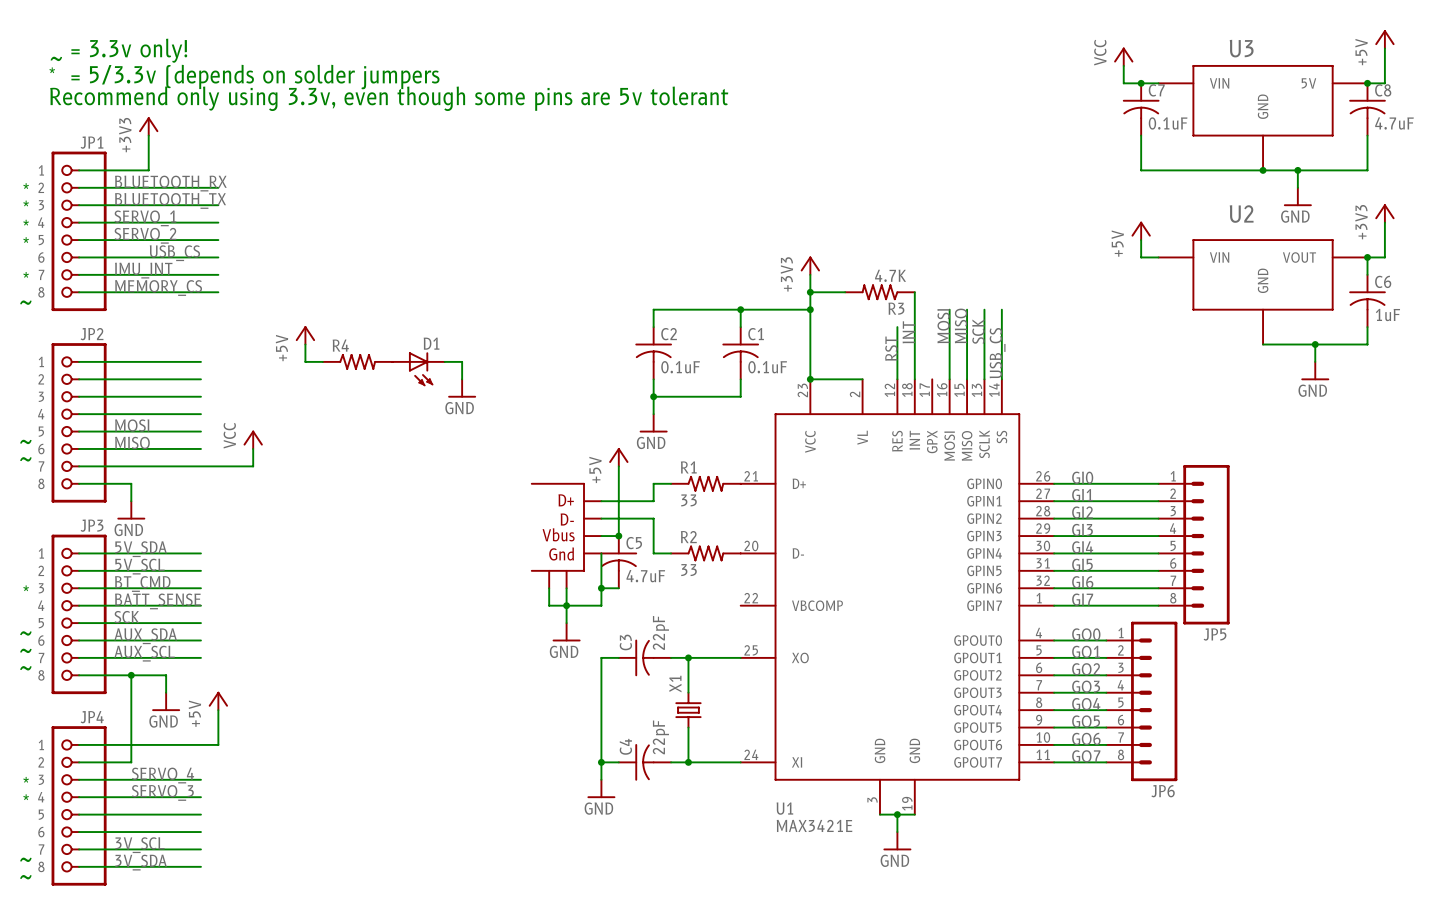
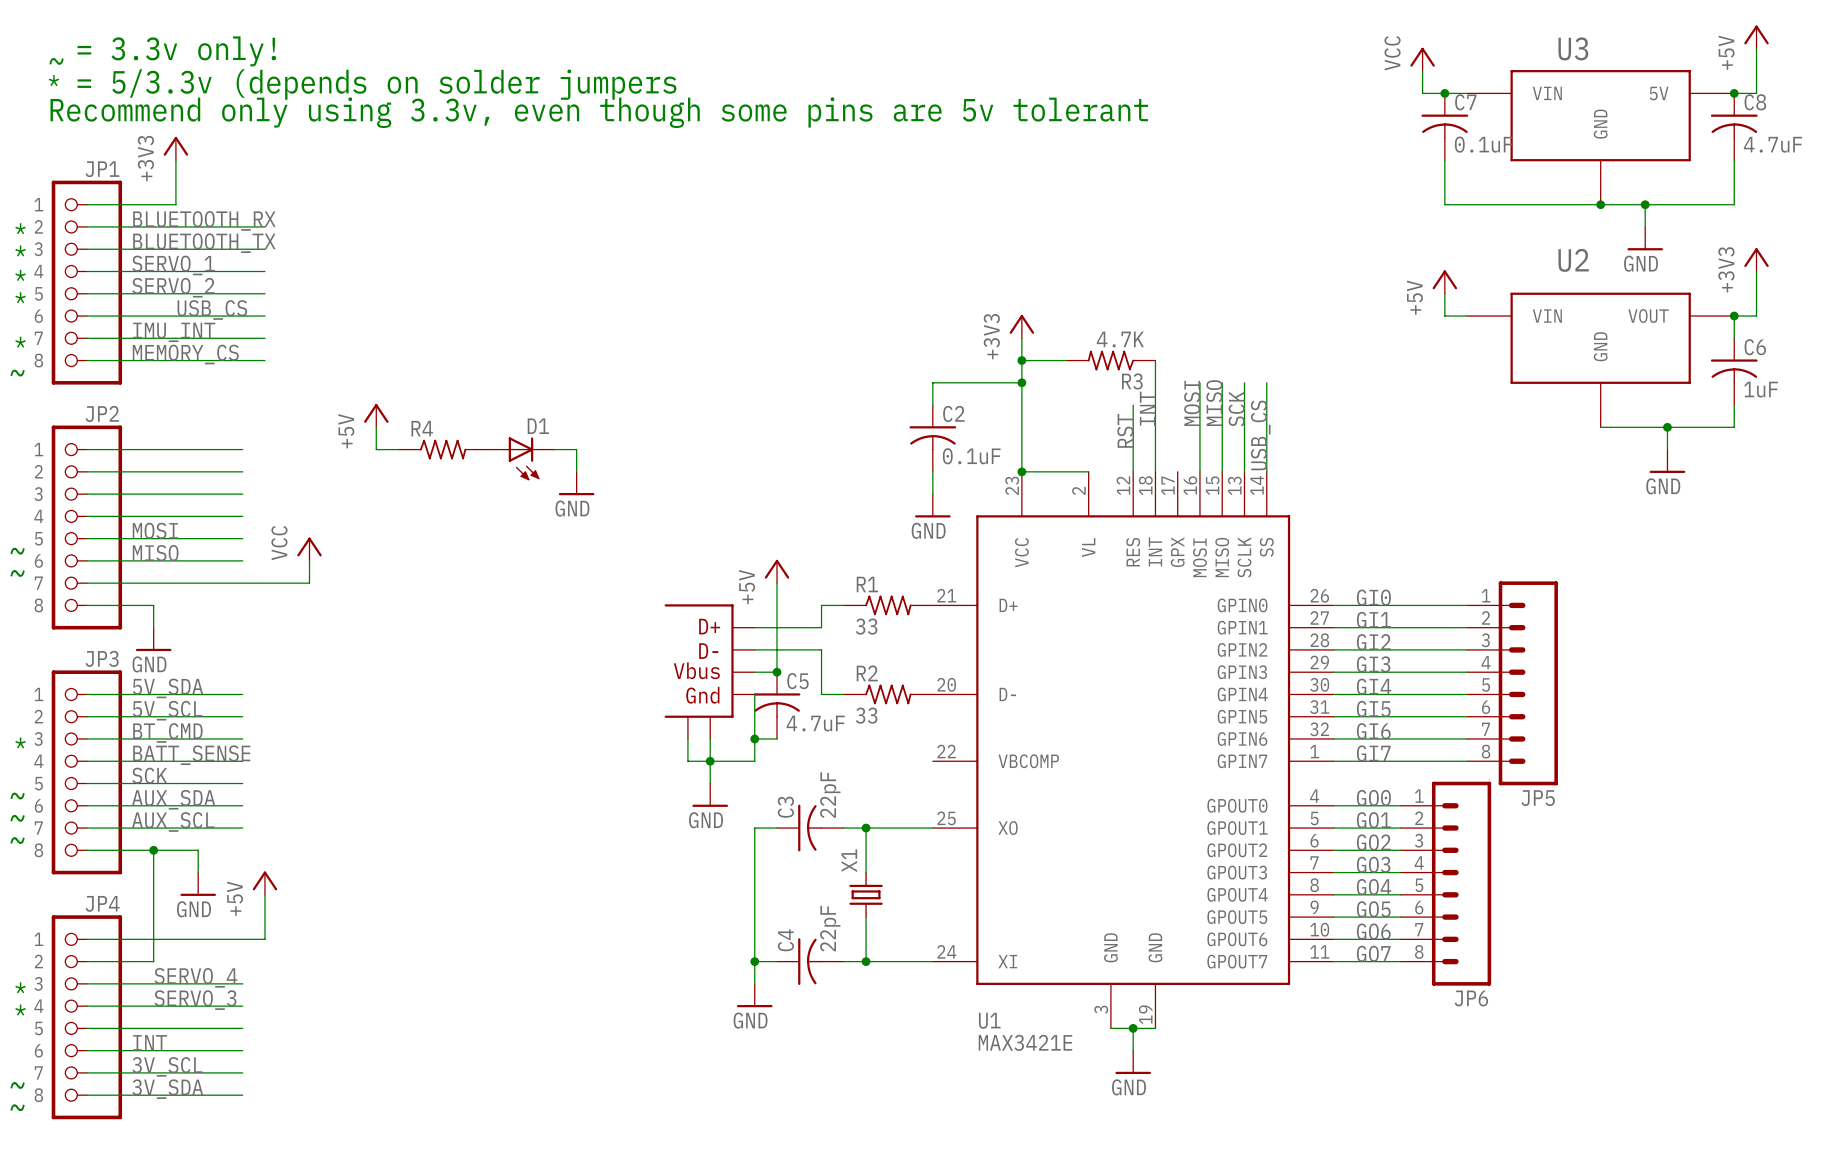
wire: (740, 309) (653, 309) (653, 327) -> none
junction: (740, 309) -> none
C1 name: C1 (756, 334) -> C2 (953, 413)
C2: 0.1uF (653, 353) -> none
wire: (653, 379) (653, 414) -> none
wire: (653, 396) (740, 396) -> none
junction: (653, 396) -> none
power symbol position: GND (653, 423) -> GND (932, 505)
label: none -> INT (150, 1042)

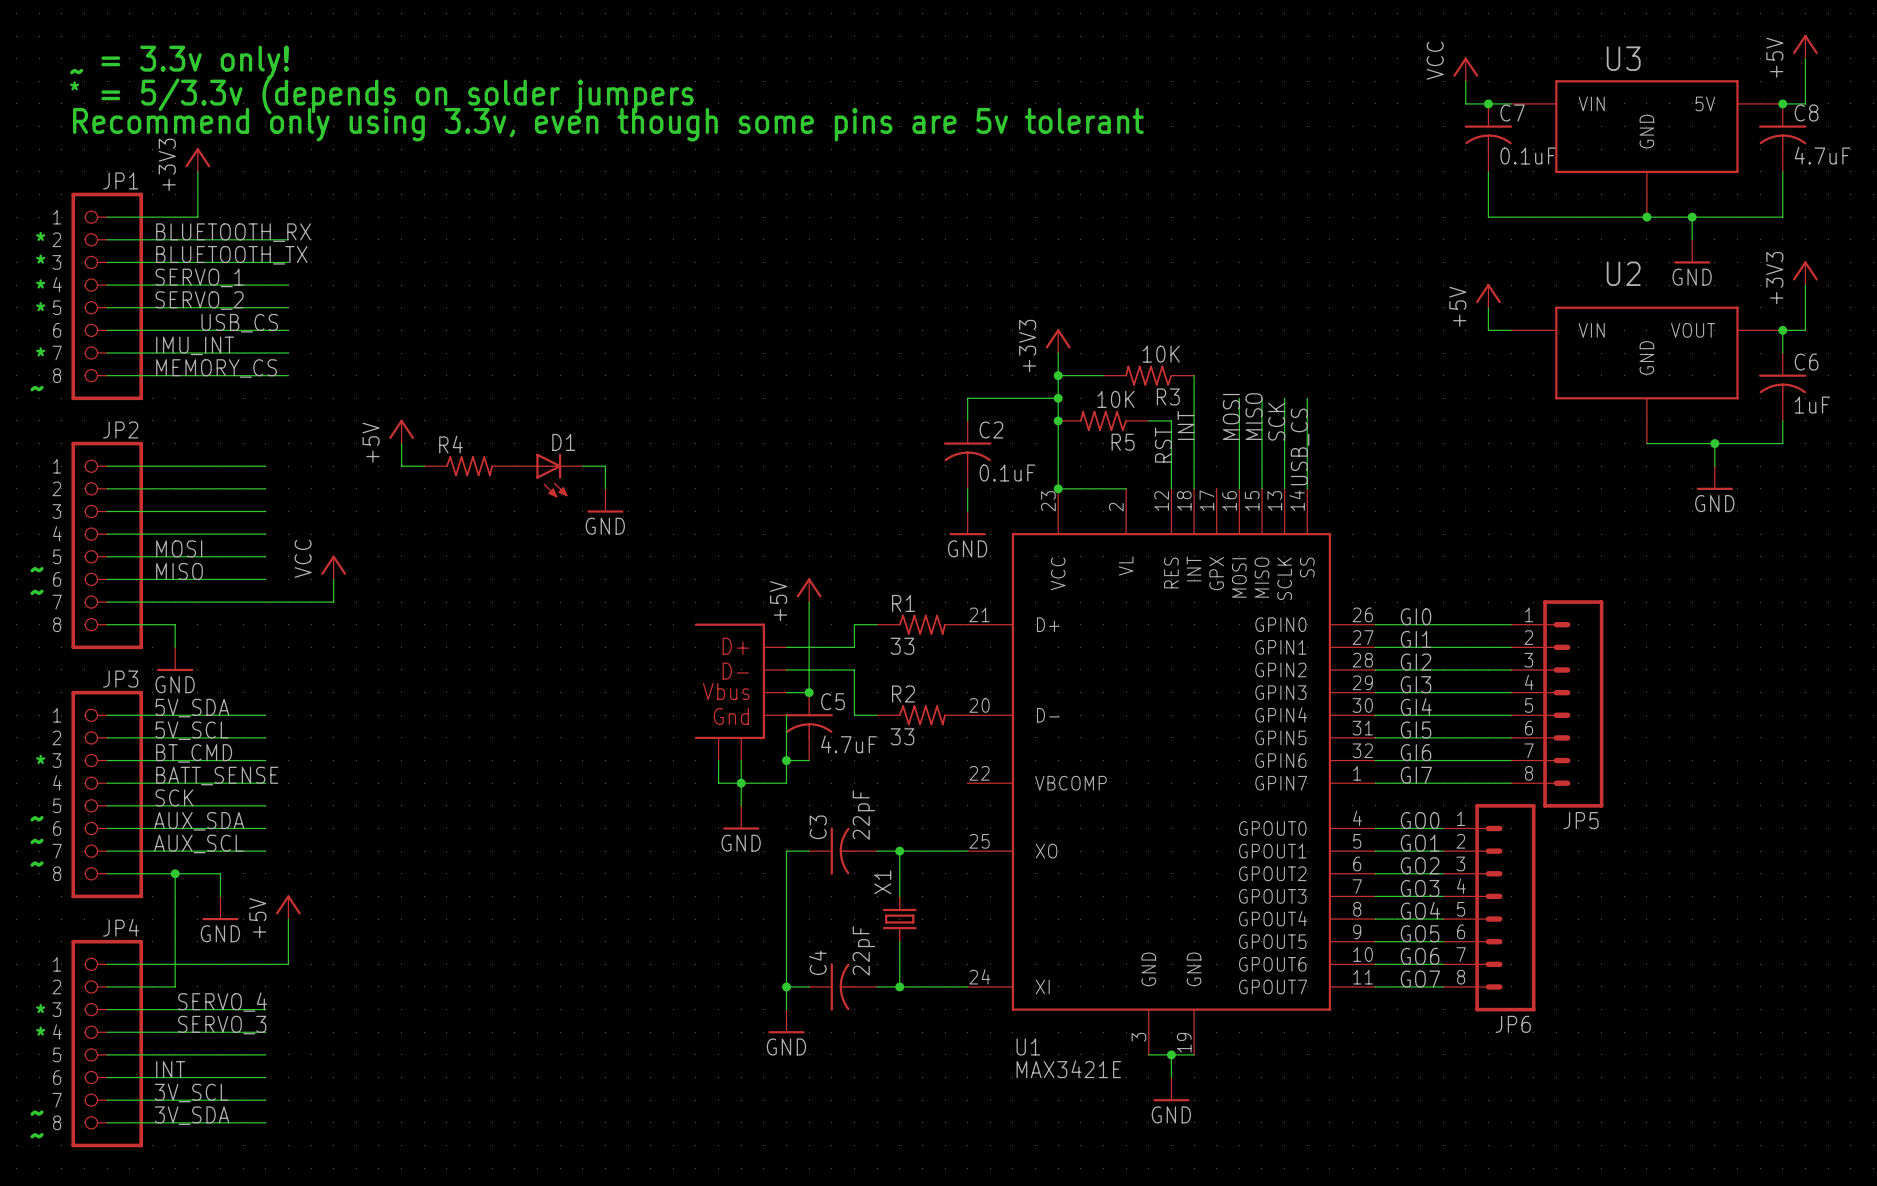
R3 value: 4.7K (1120, 339) -> 10K (1161, 354)
junction: none -> (1058, 420)
R5: none -> 10K (1103, 420)
wire: none -> (1148, 420) (1171, 420)

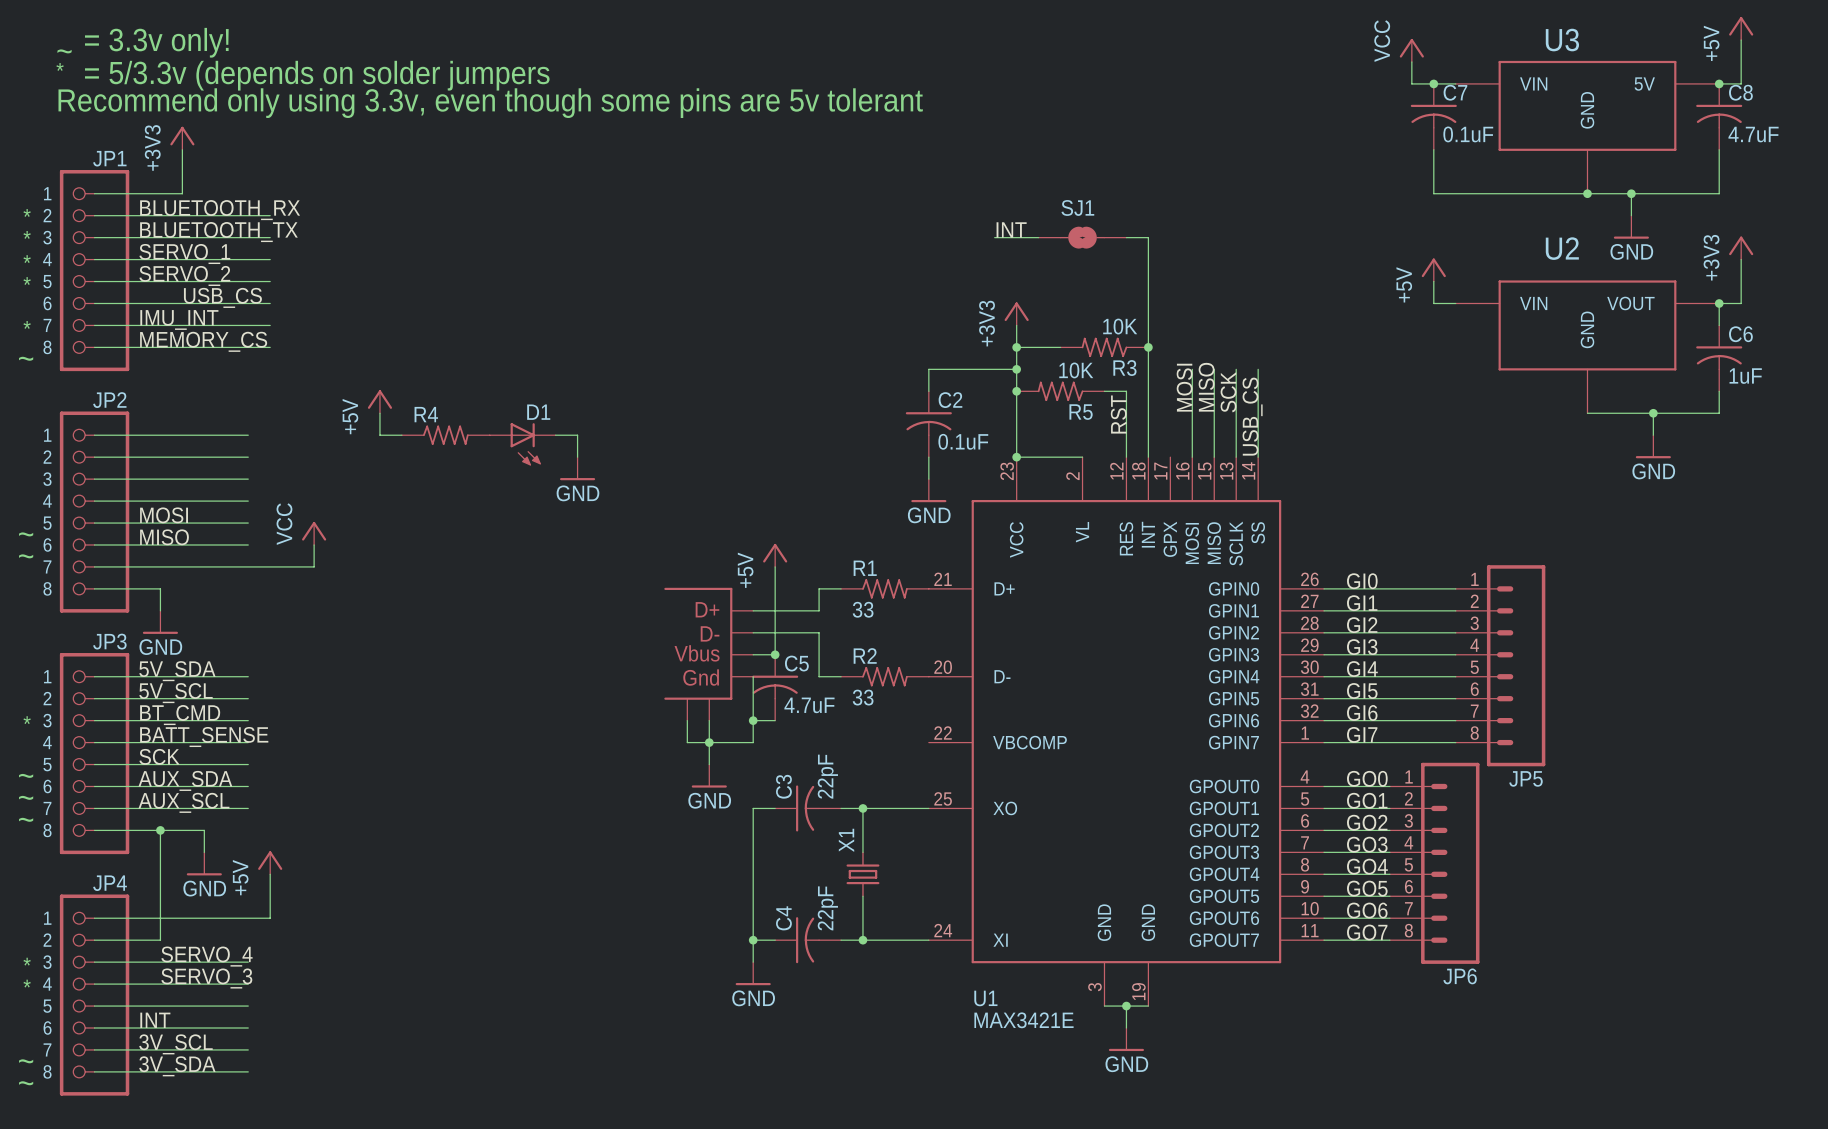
label: none -> INT (1011, 229)
wire: none -> (994, 237) (1038, 237)
SJ1: none -> (1082, 237)
wire: none -> (1126, 237) (1148, 237) (1148, 347)
junction: none -> (1148, 347)
label: INT (1186, 425) -> none

